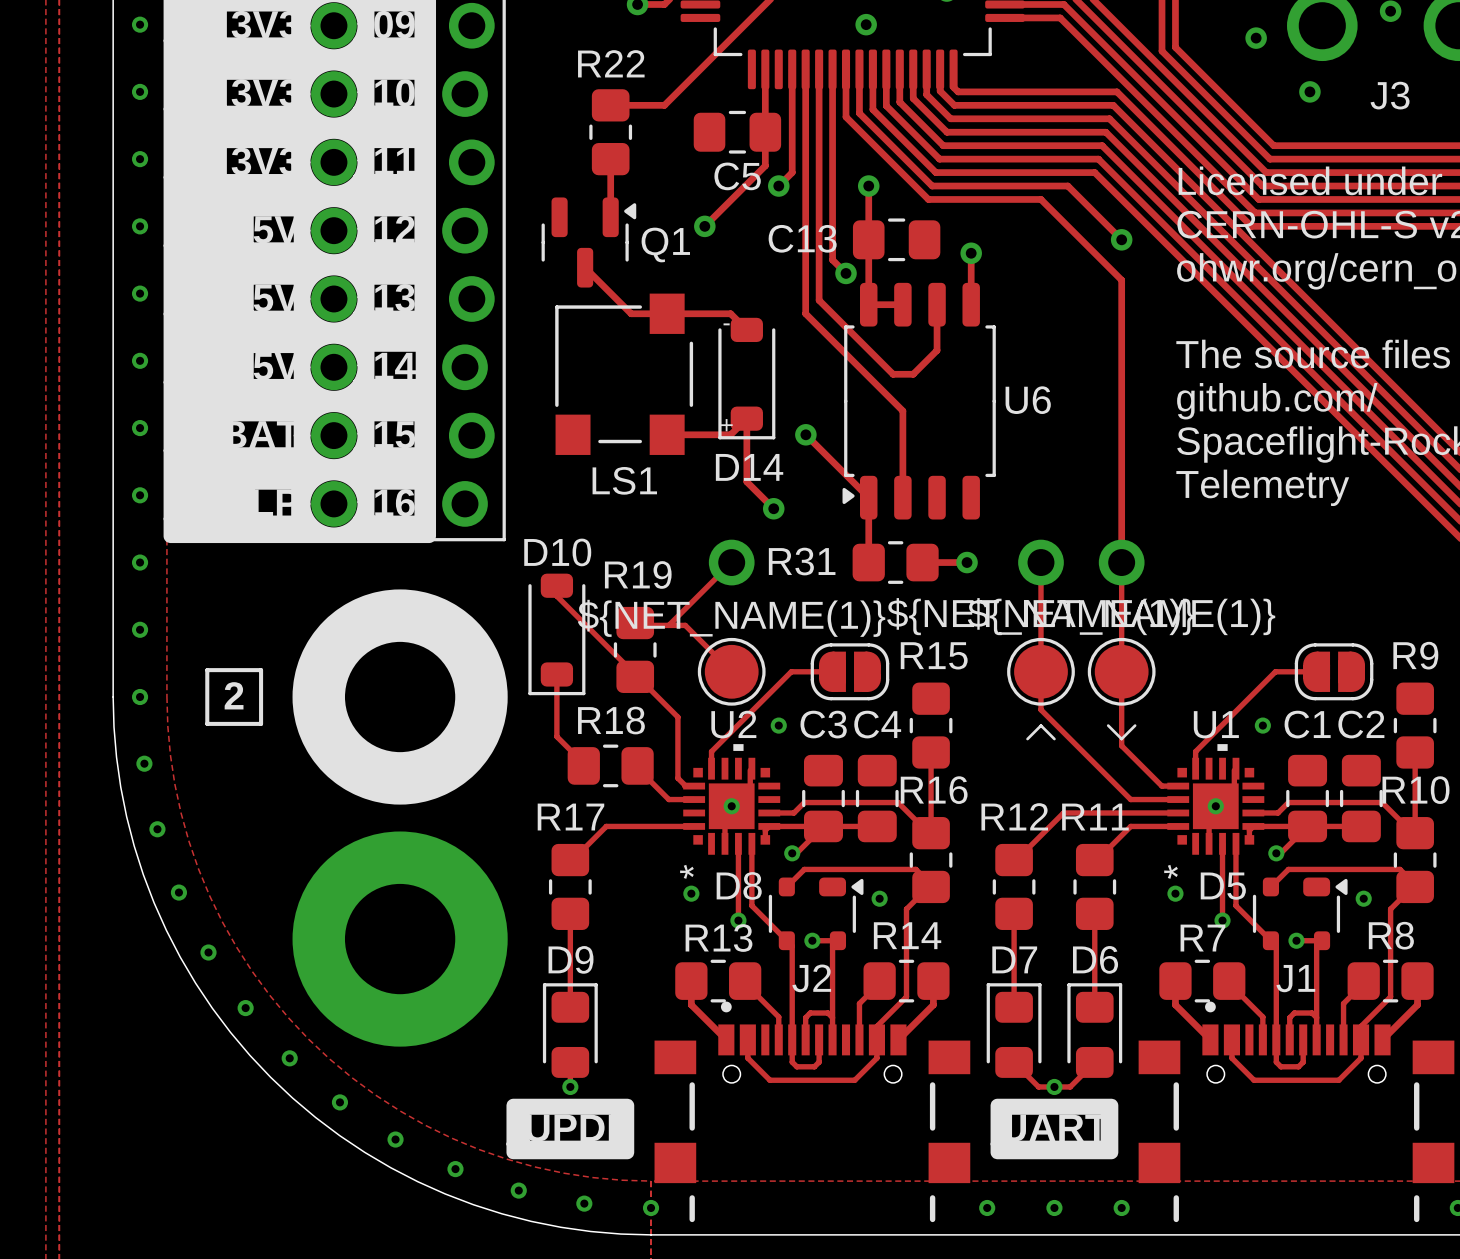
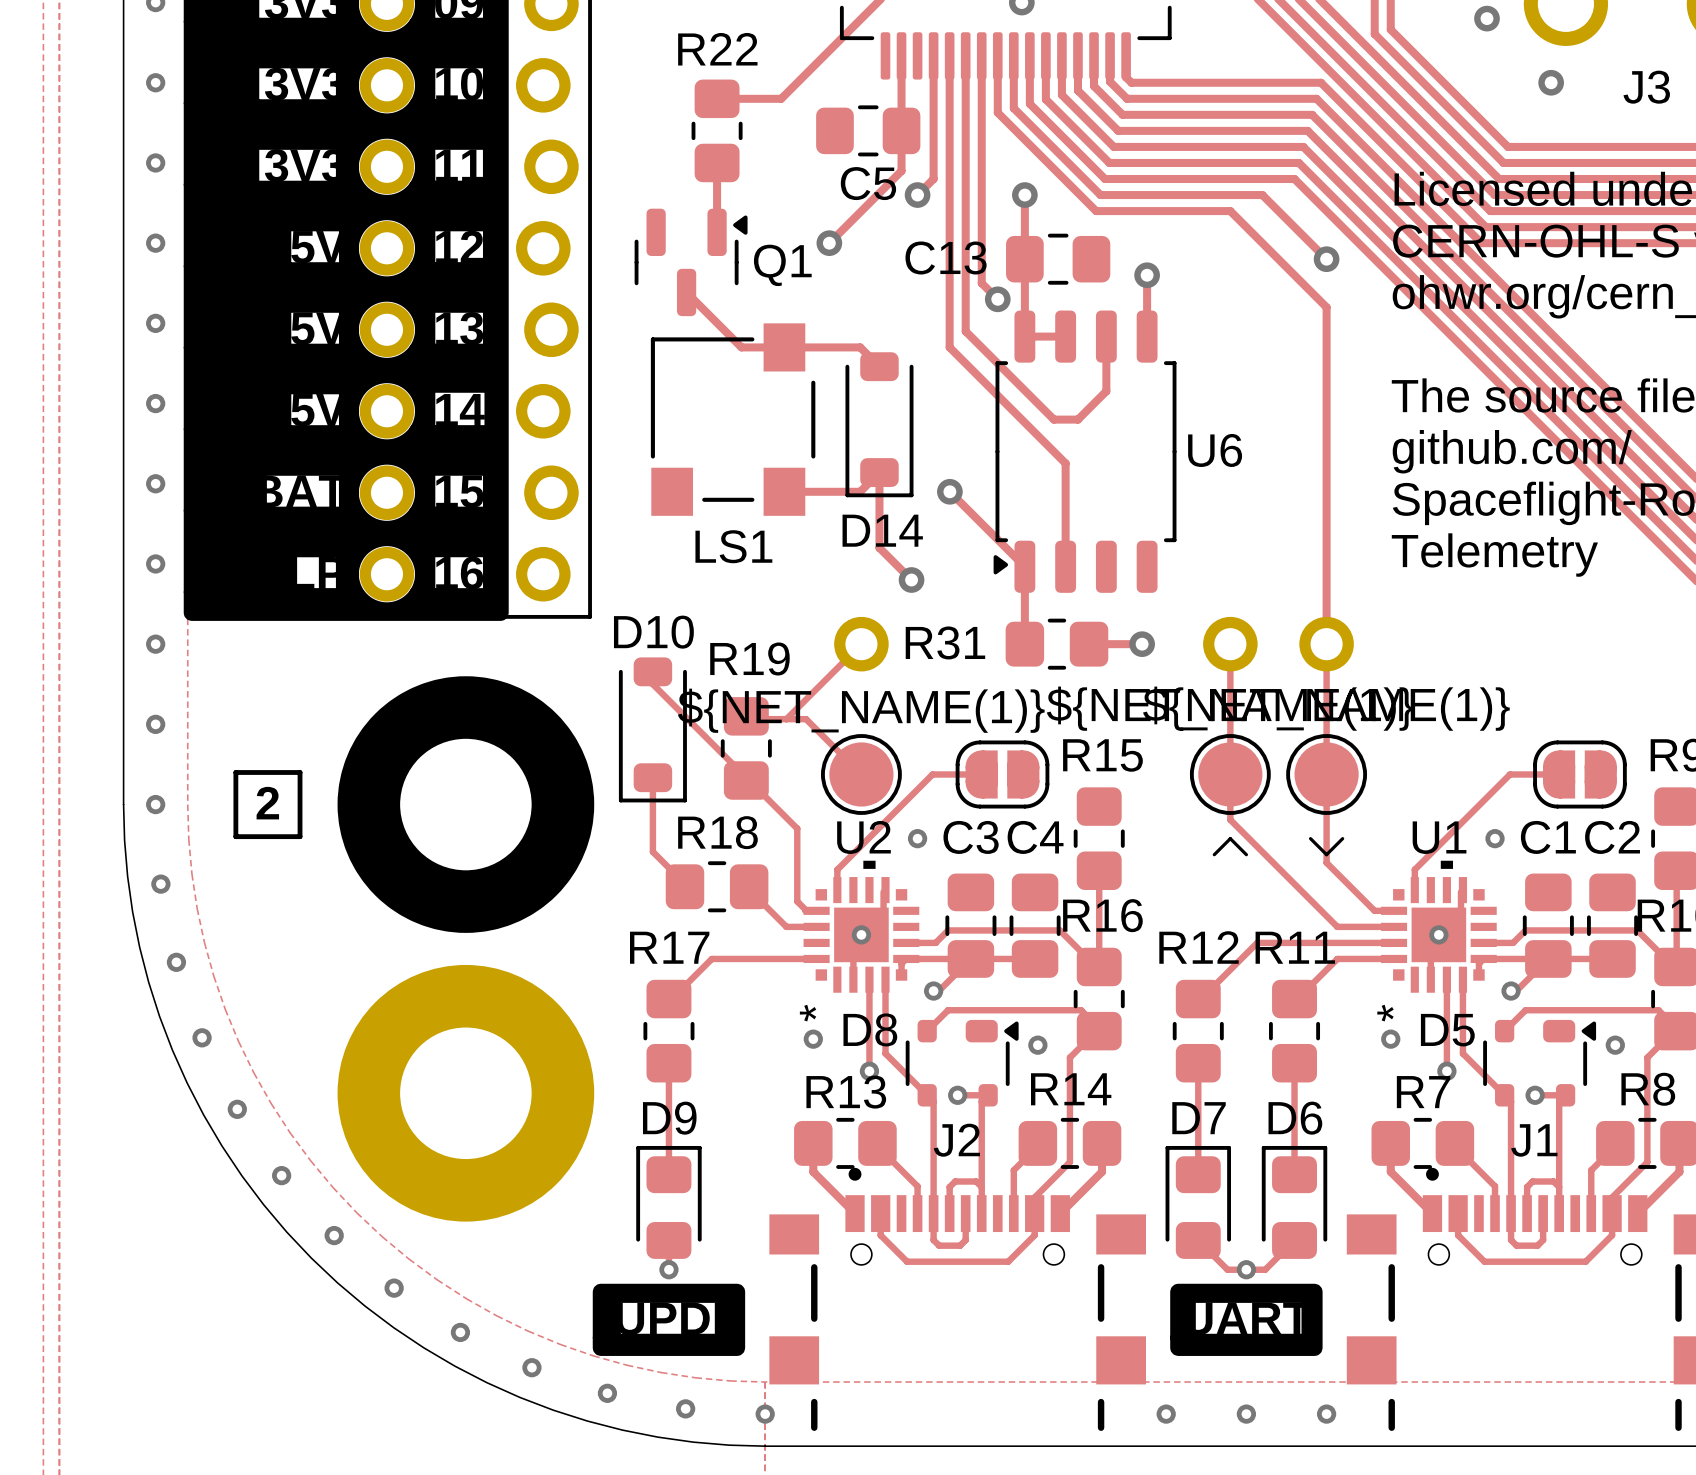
LS1 text: - (726, 324) -> none
LS1 text: + (726, 425) -> none

